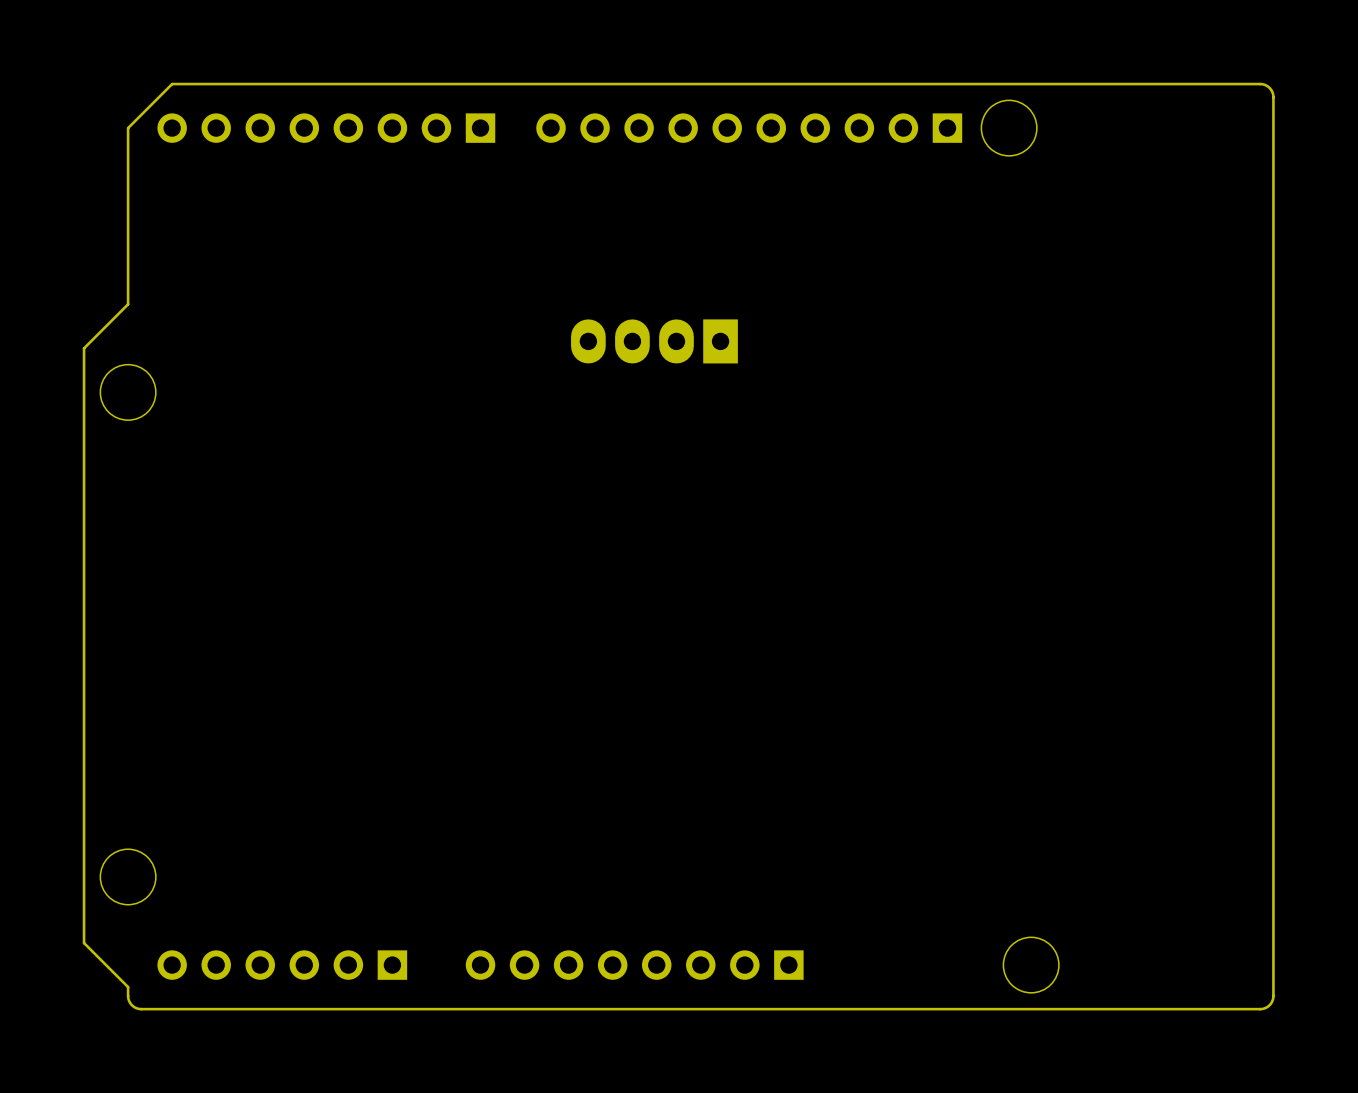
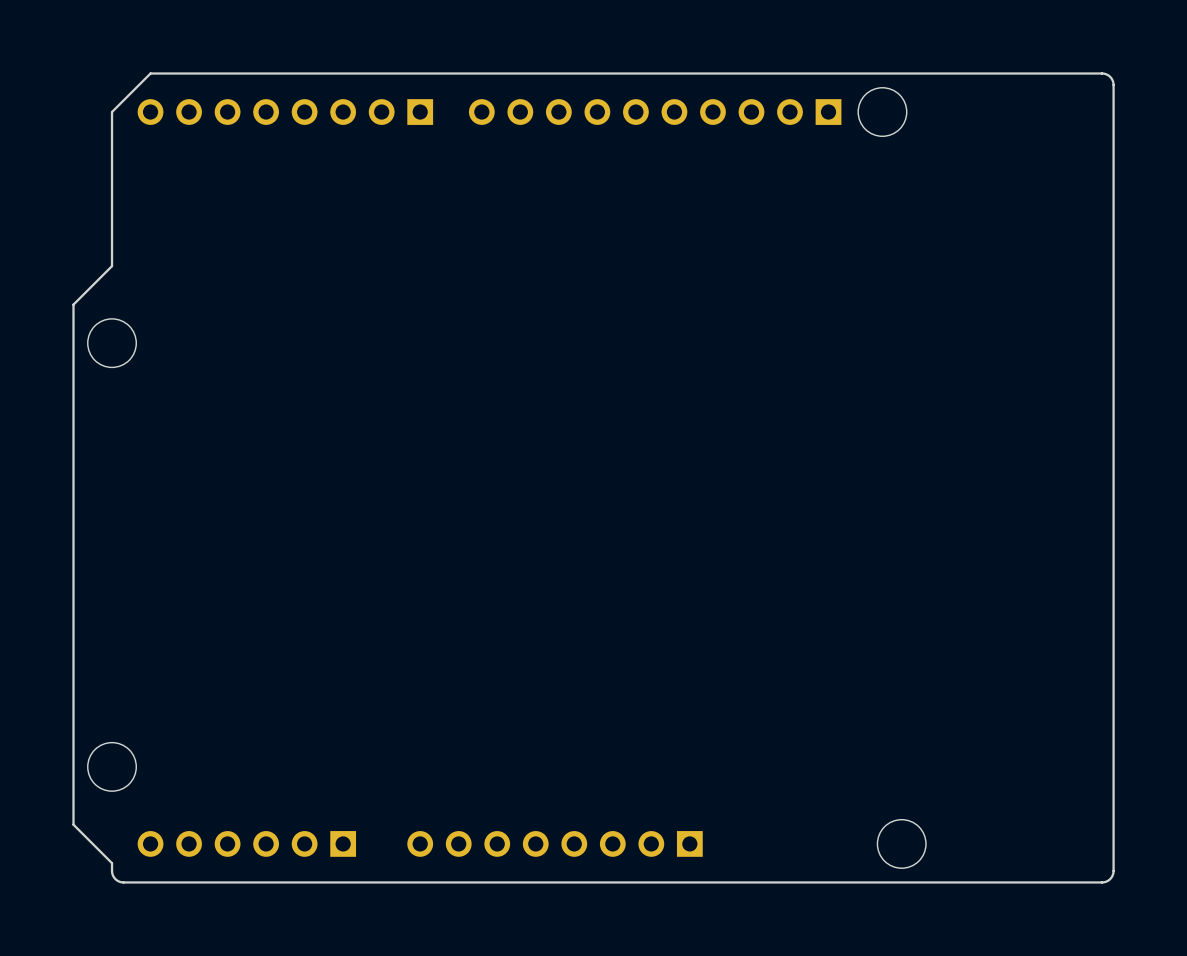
part: (654, 341) -> none

